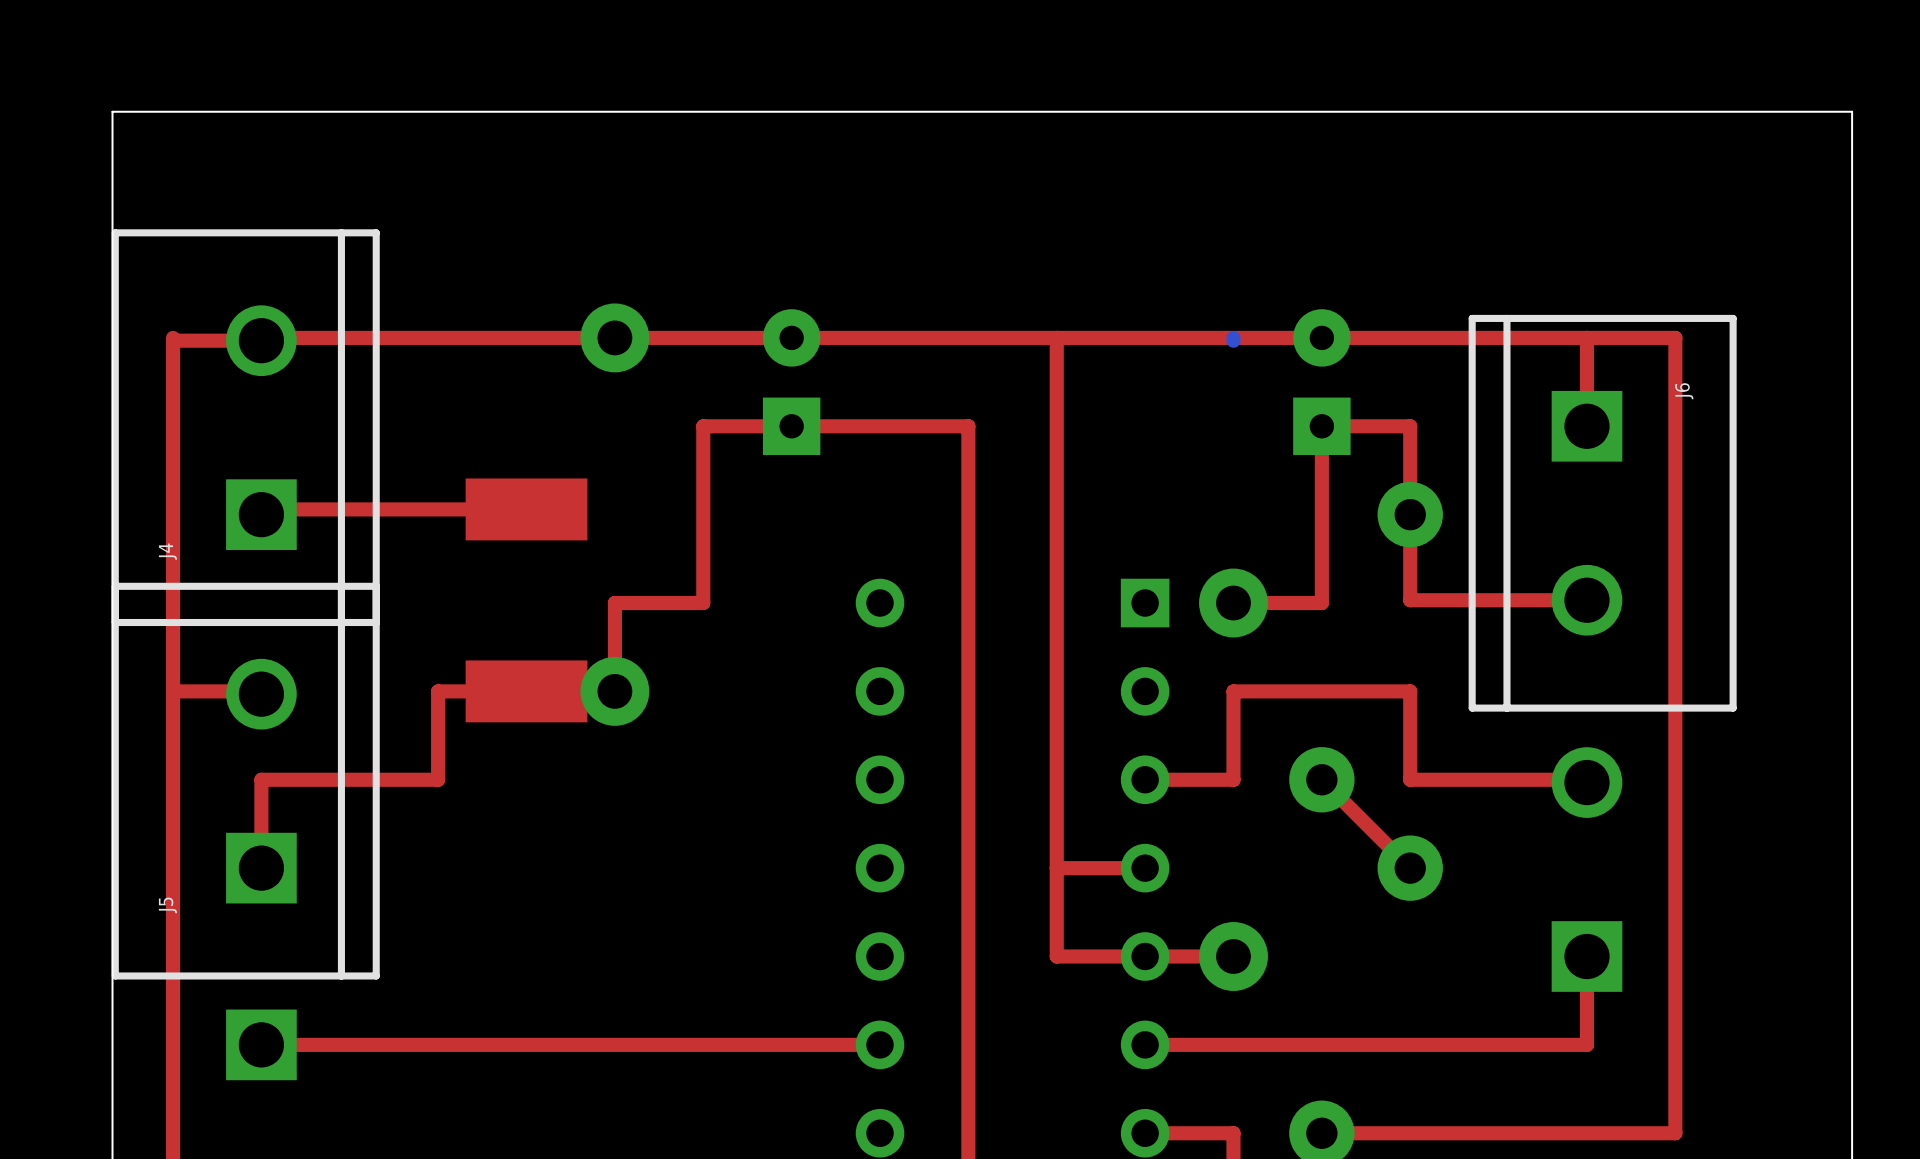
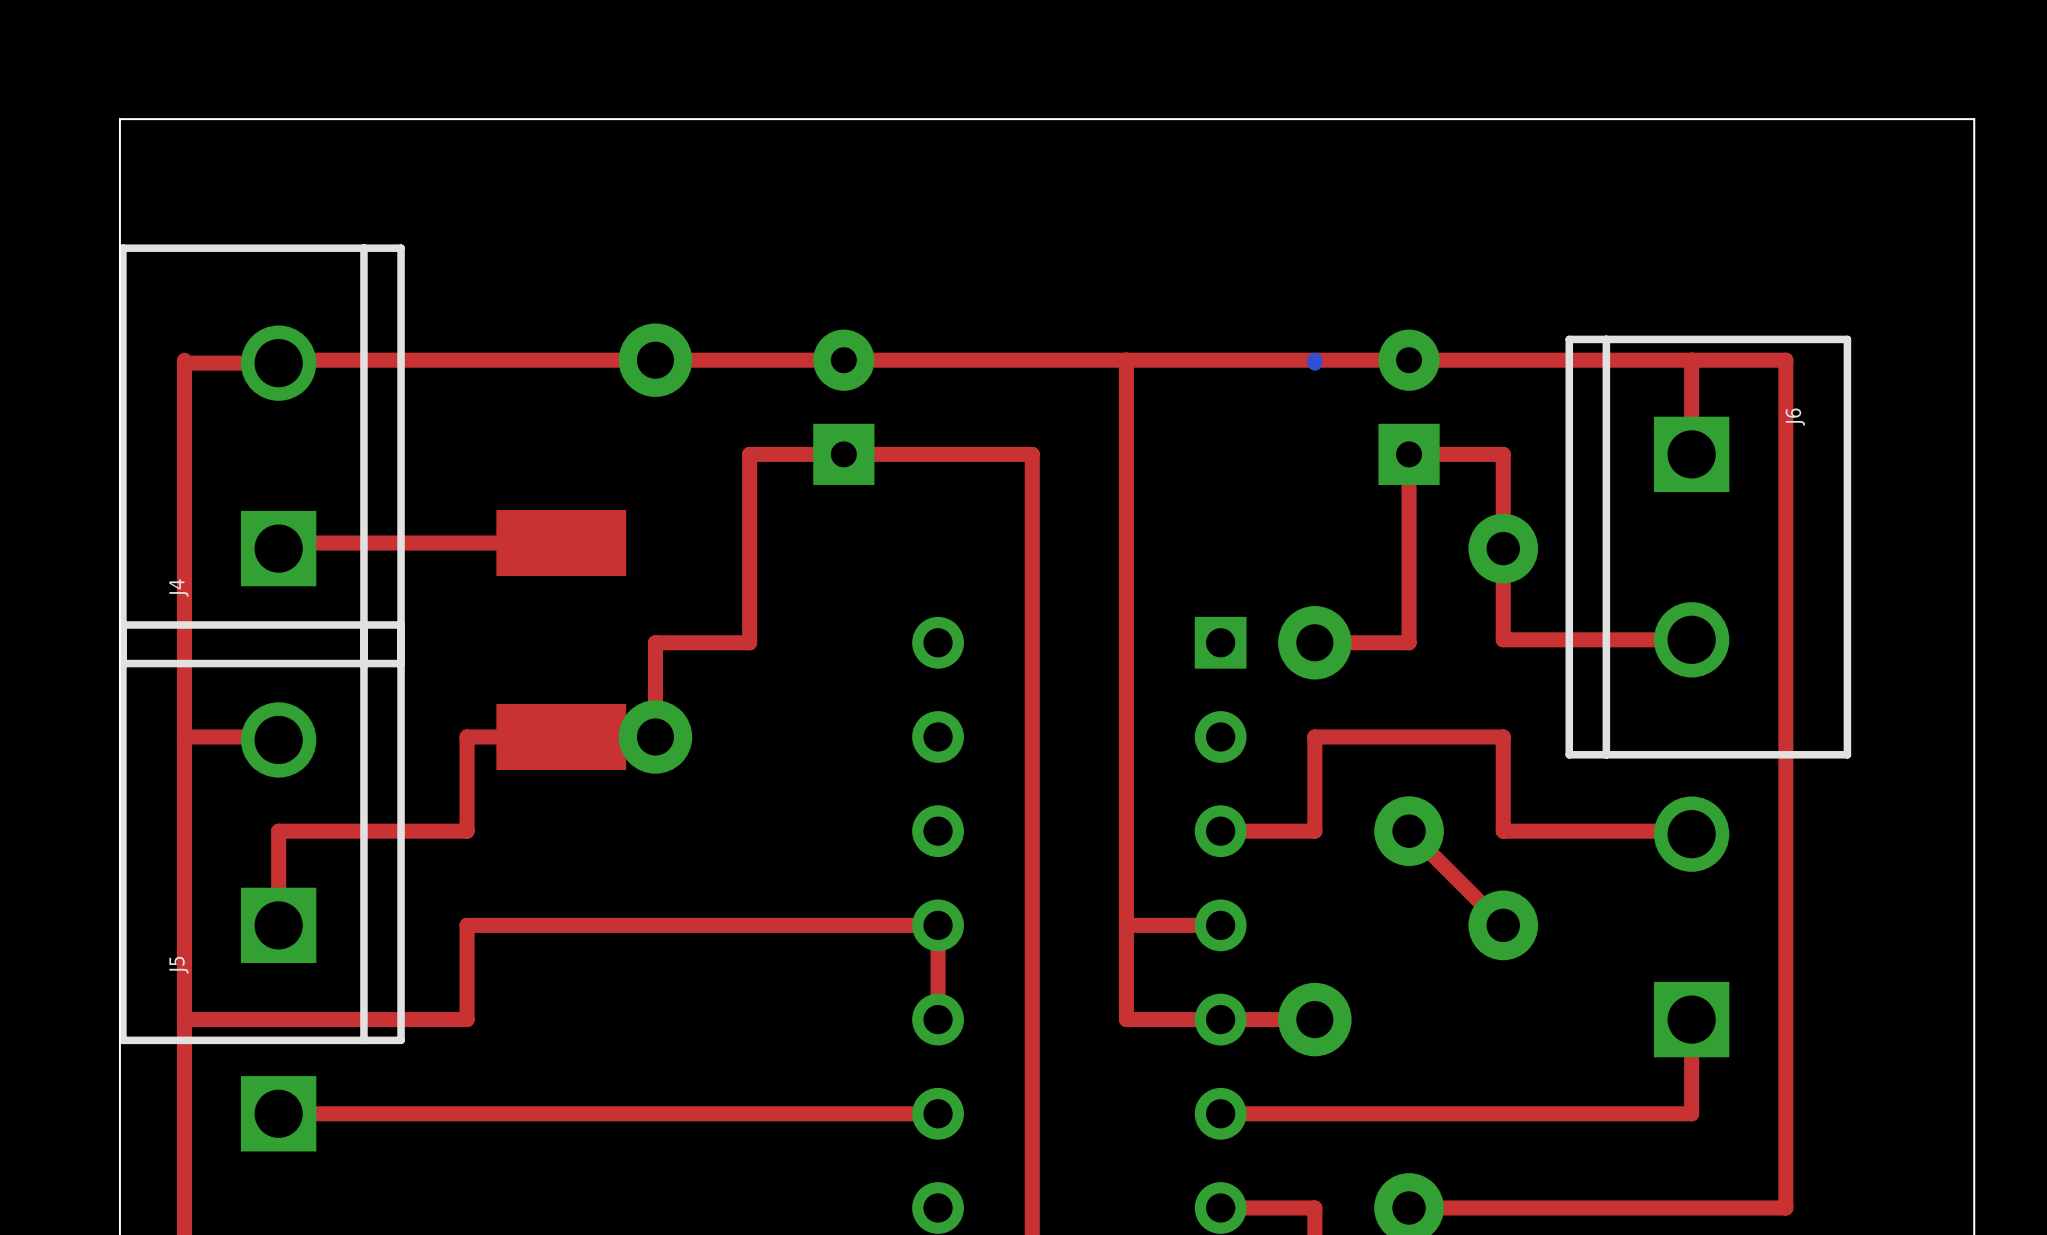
top track: none -> (938, 1019) (938, 925) (467, 925) (467, 1019) (184, 1019)

